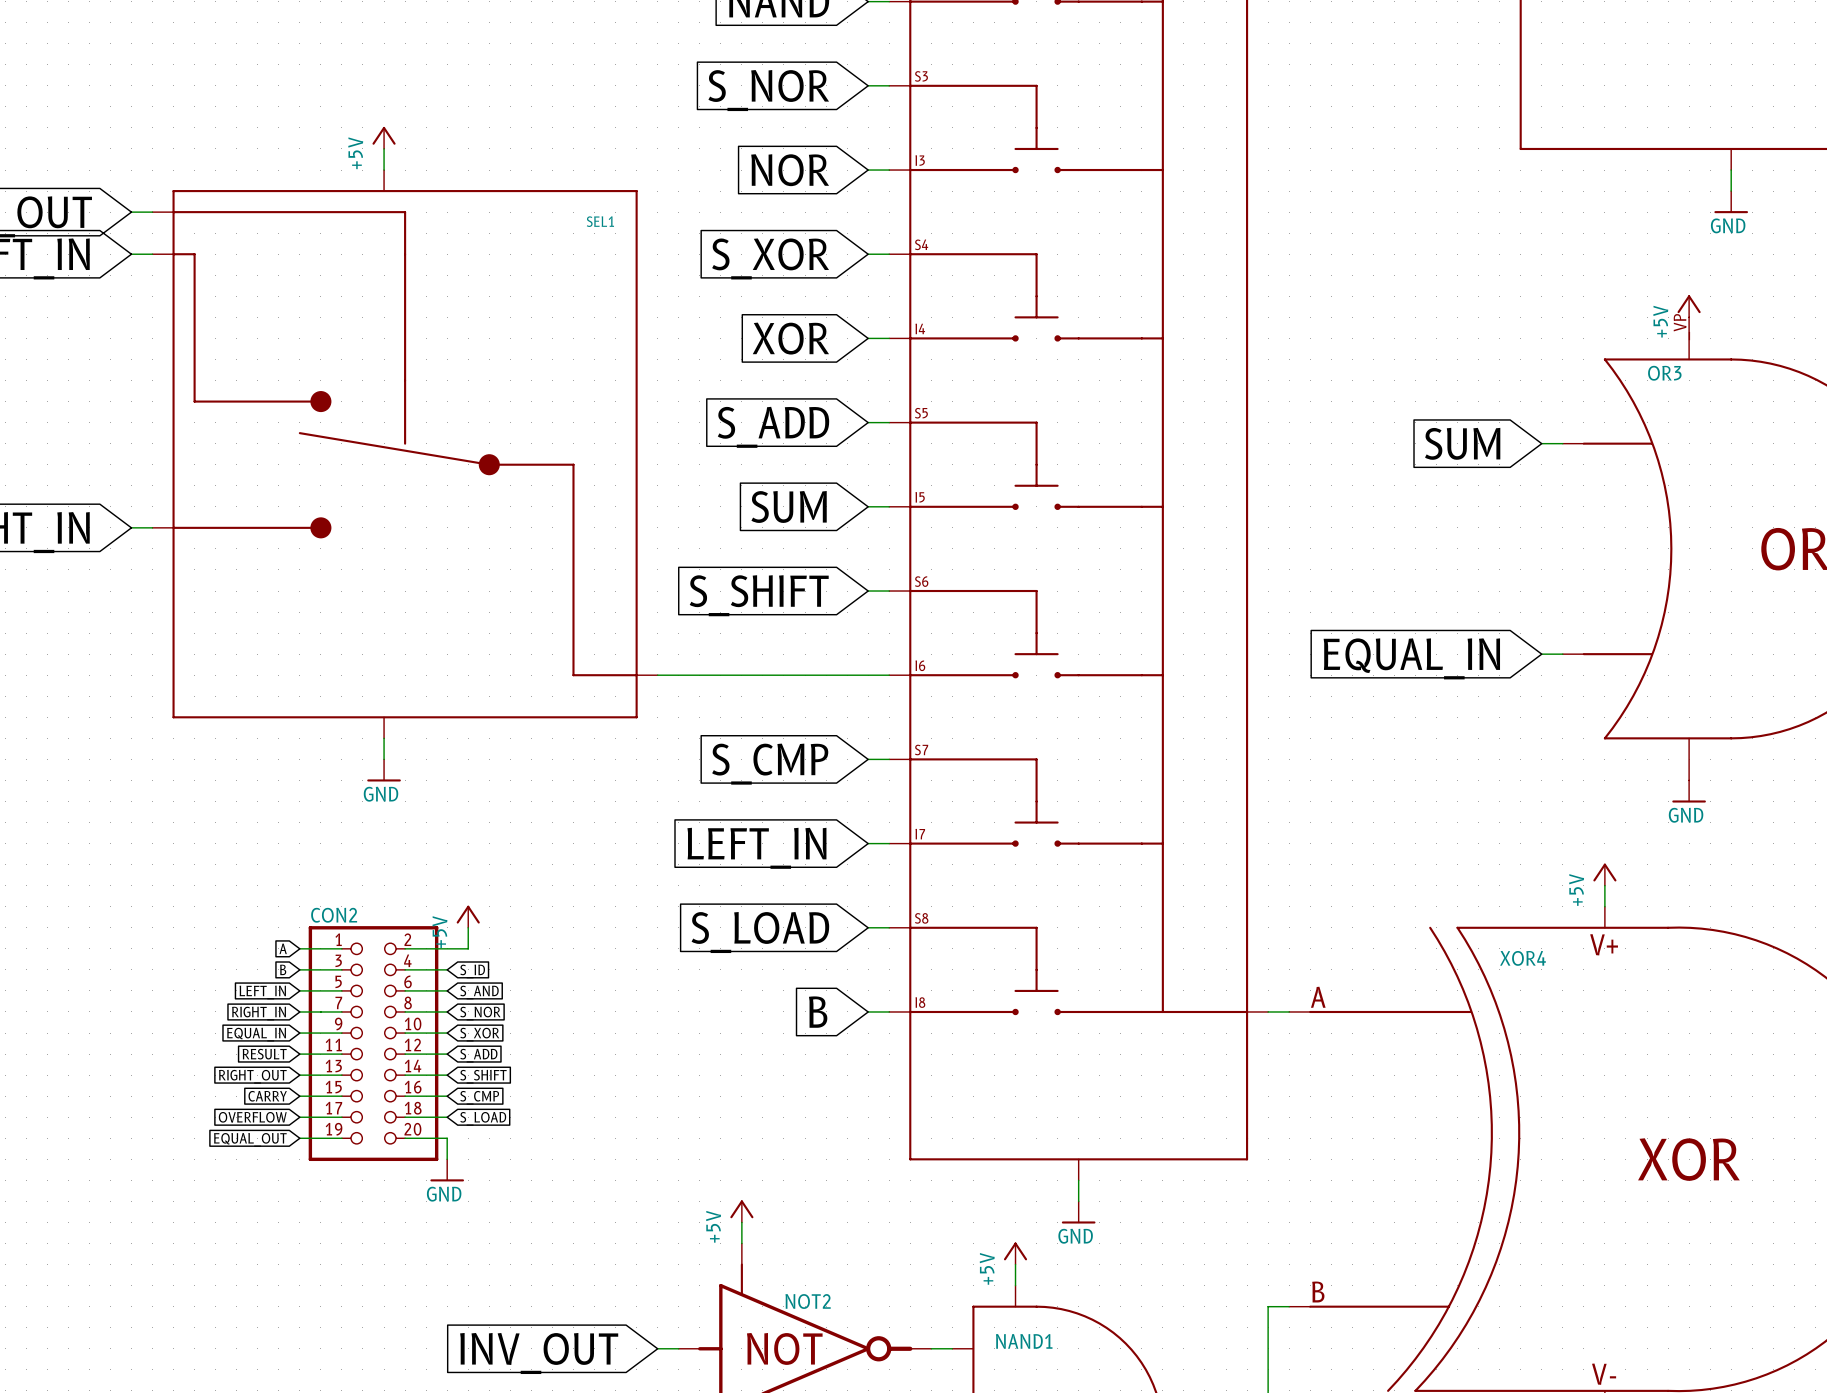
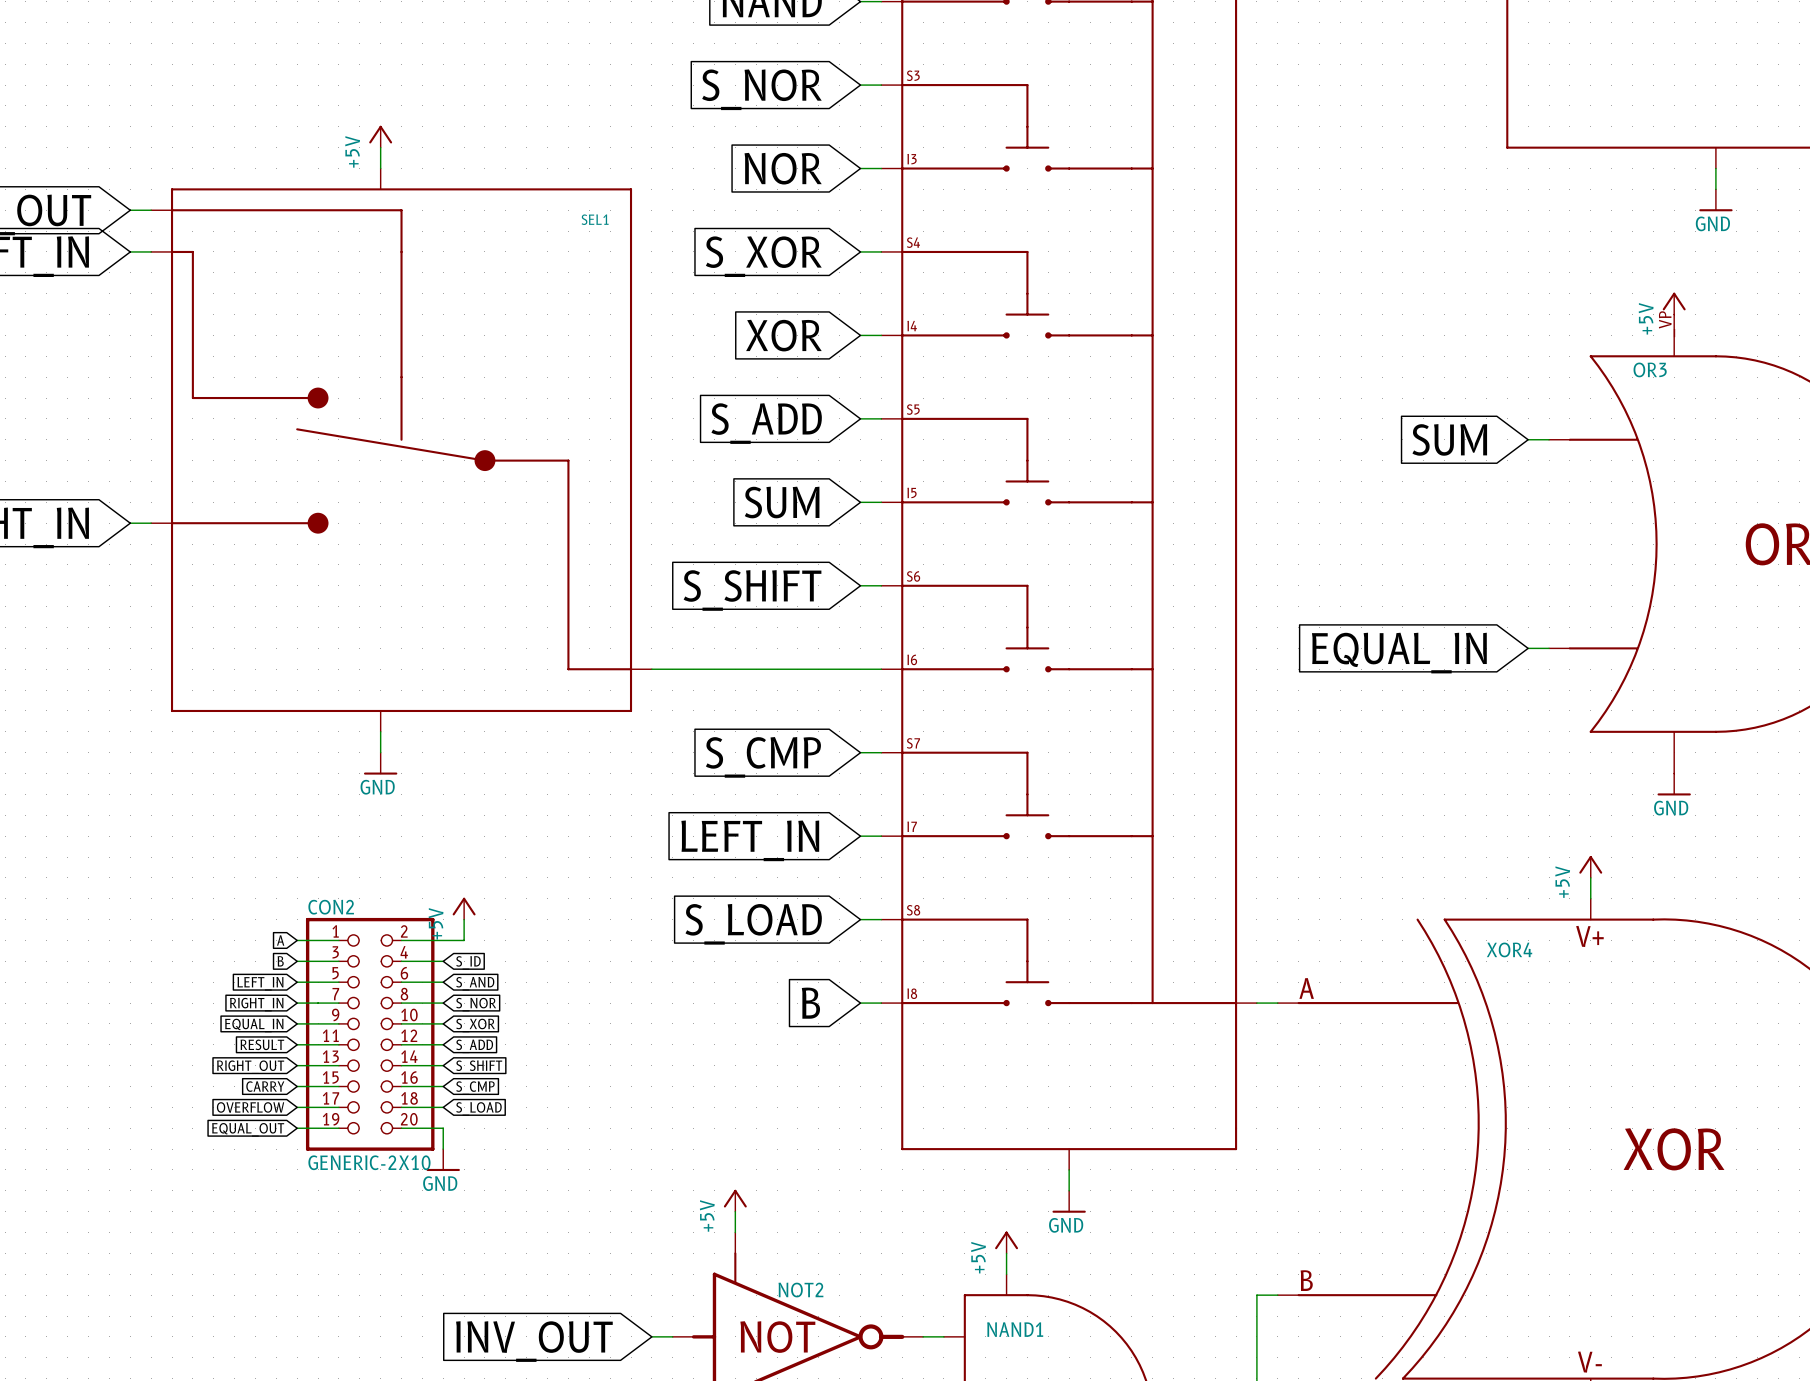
CON2 value: none -> GENERIC-2X10 (369, 1162)

